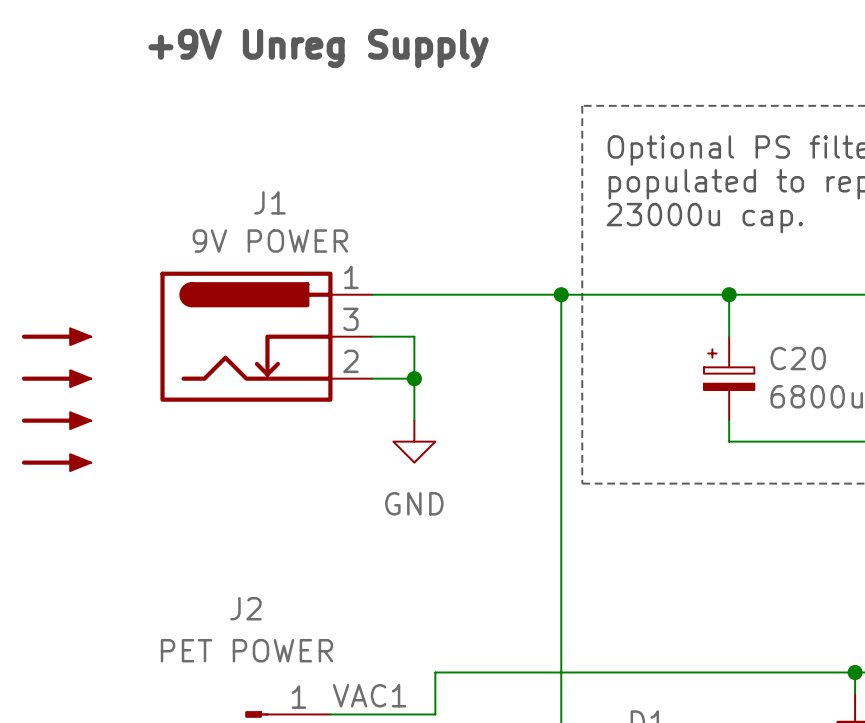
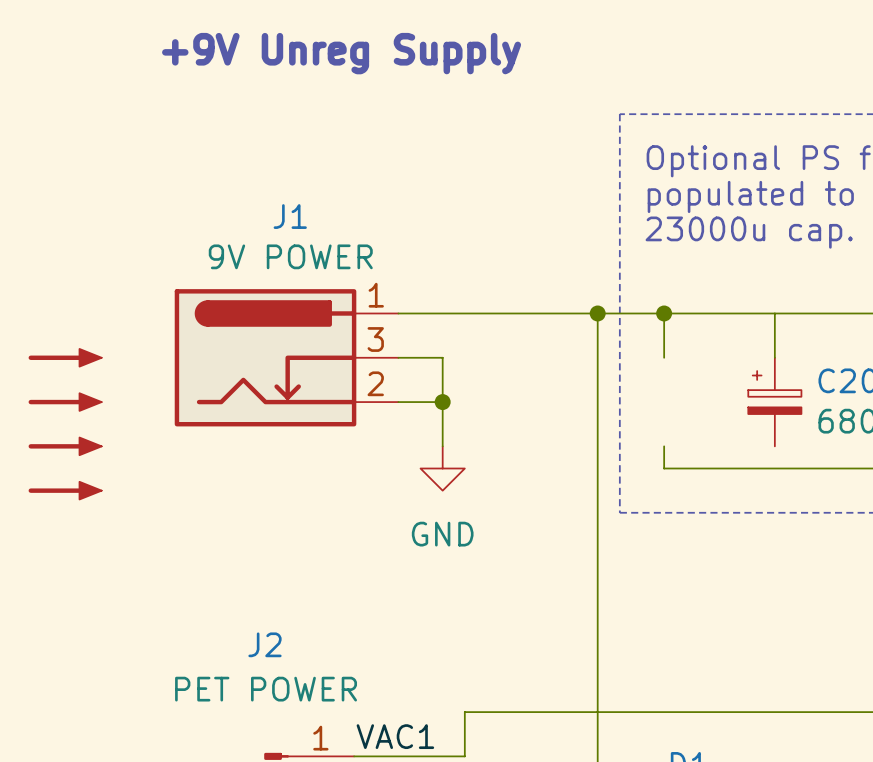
wire: none -> (664, 313) (664, 357)
junction: none -> (664, 313)
junction: (729, 294) -> none
wire: (729, 420) (729, 441) -> (664, 446) (664, 468) (774, 468)

